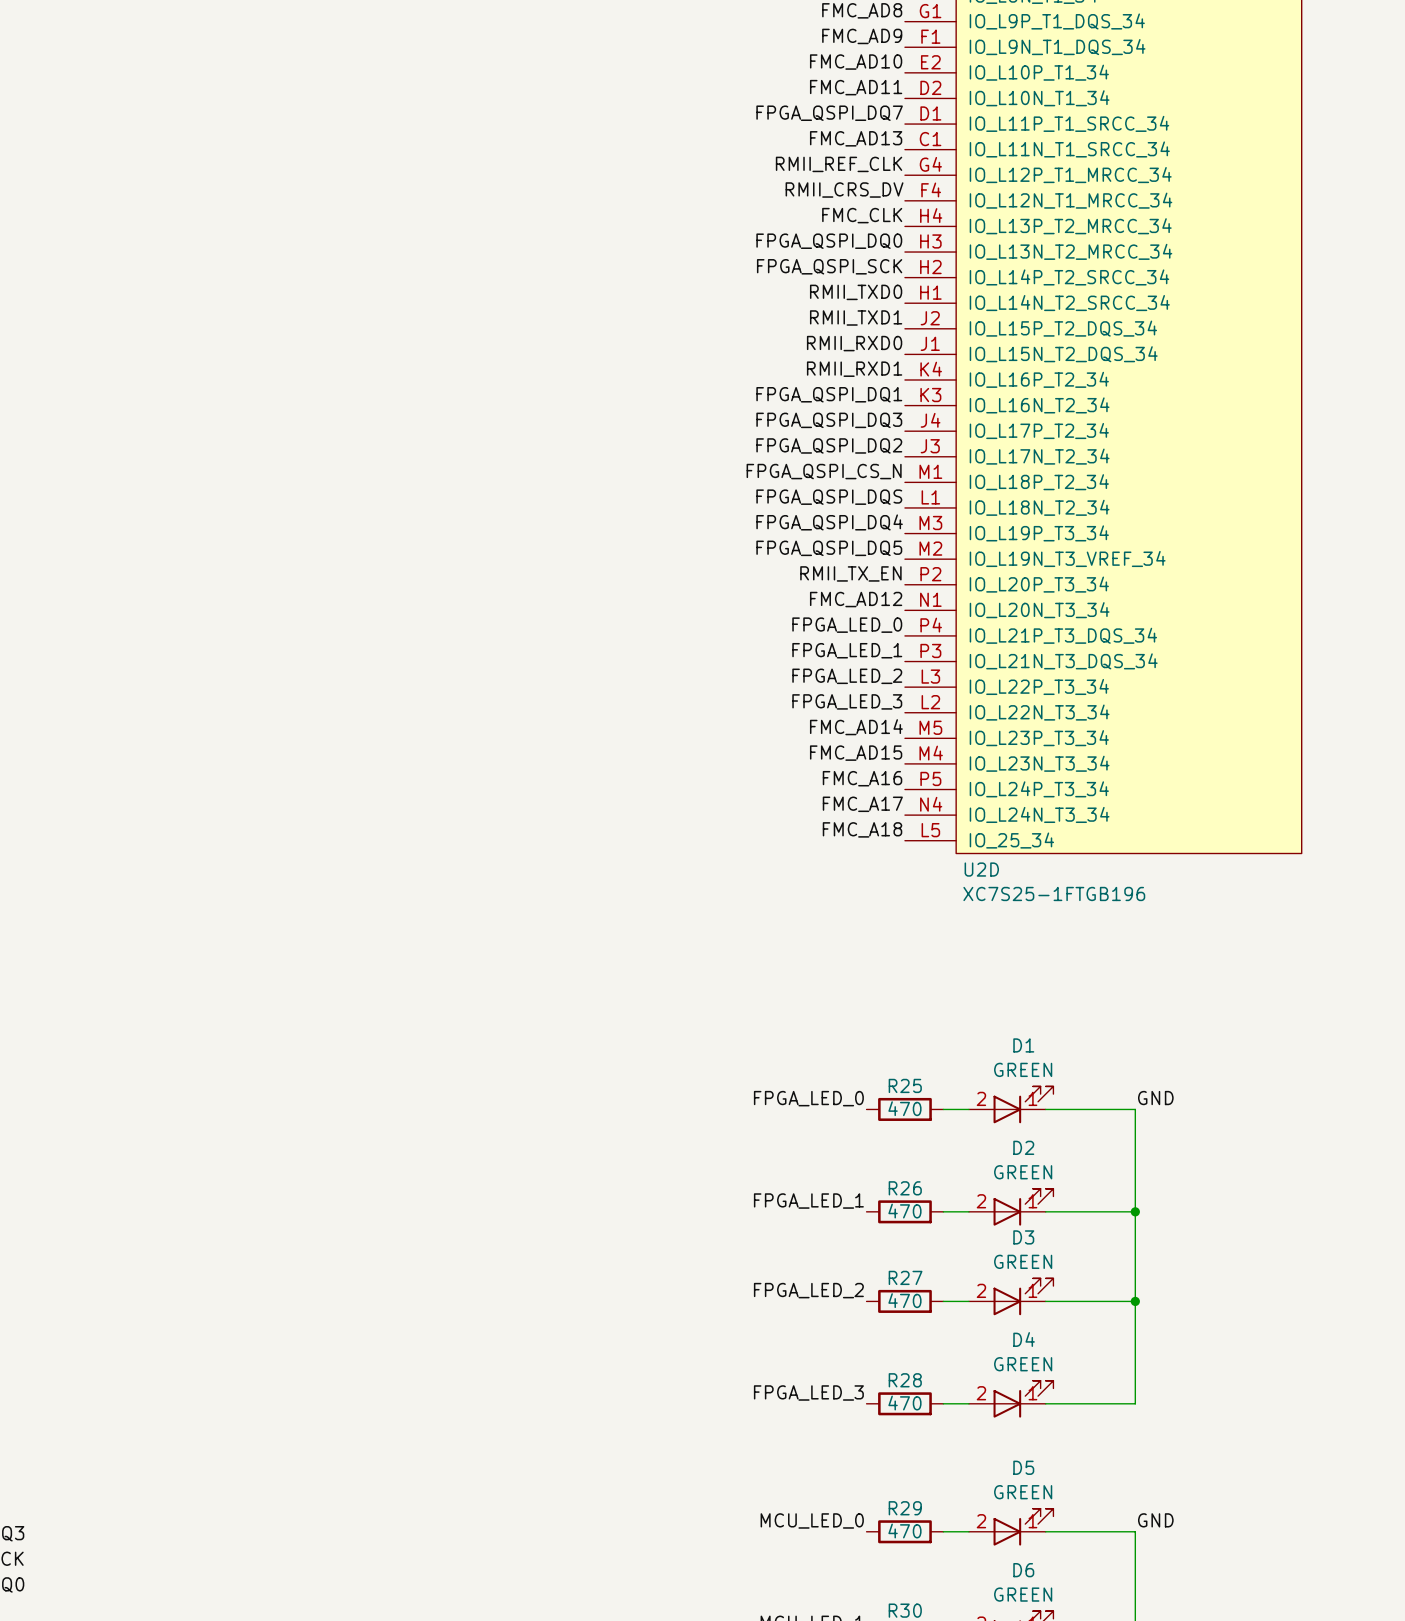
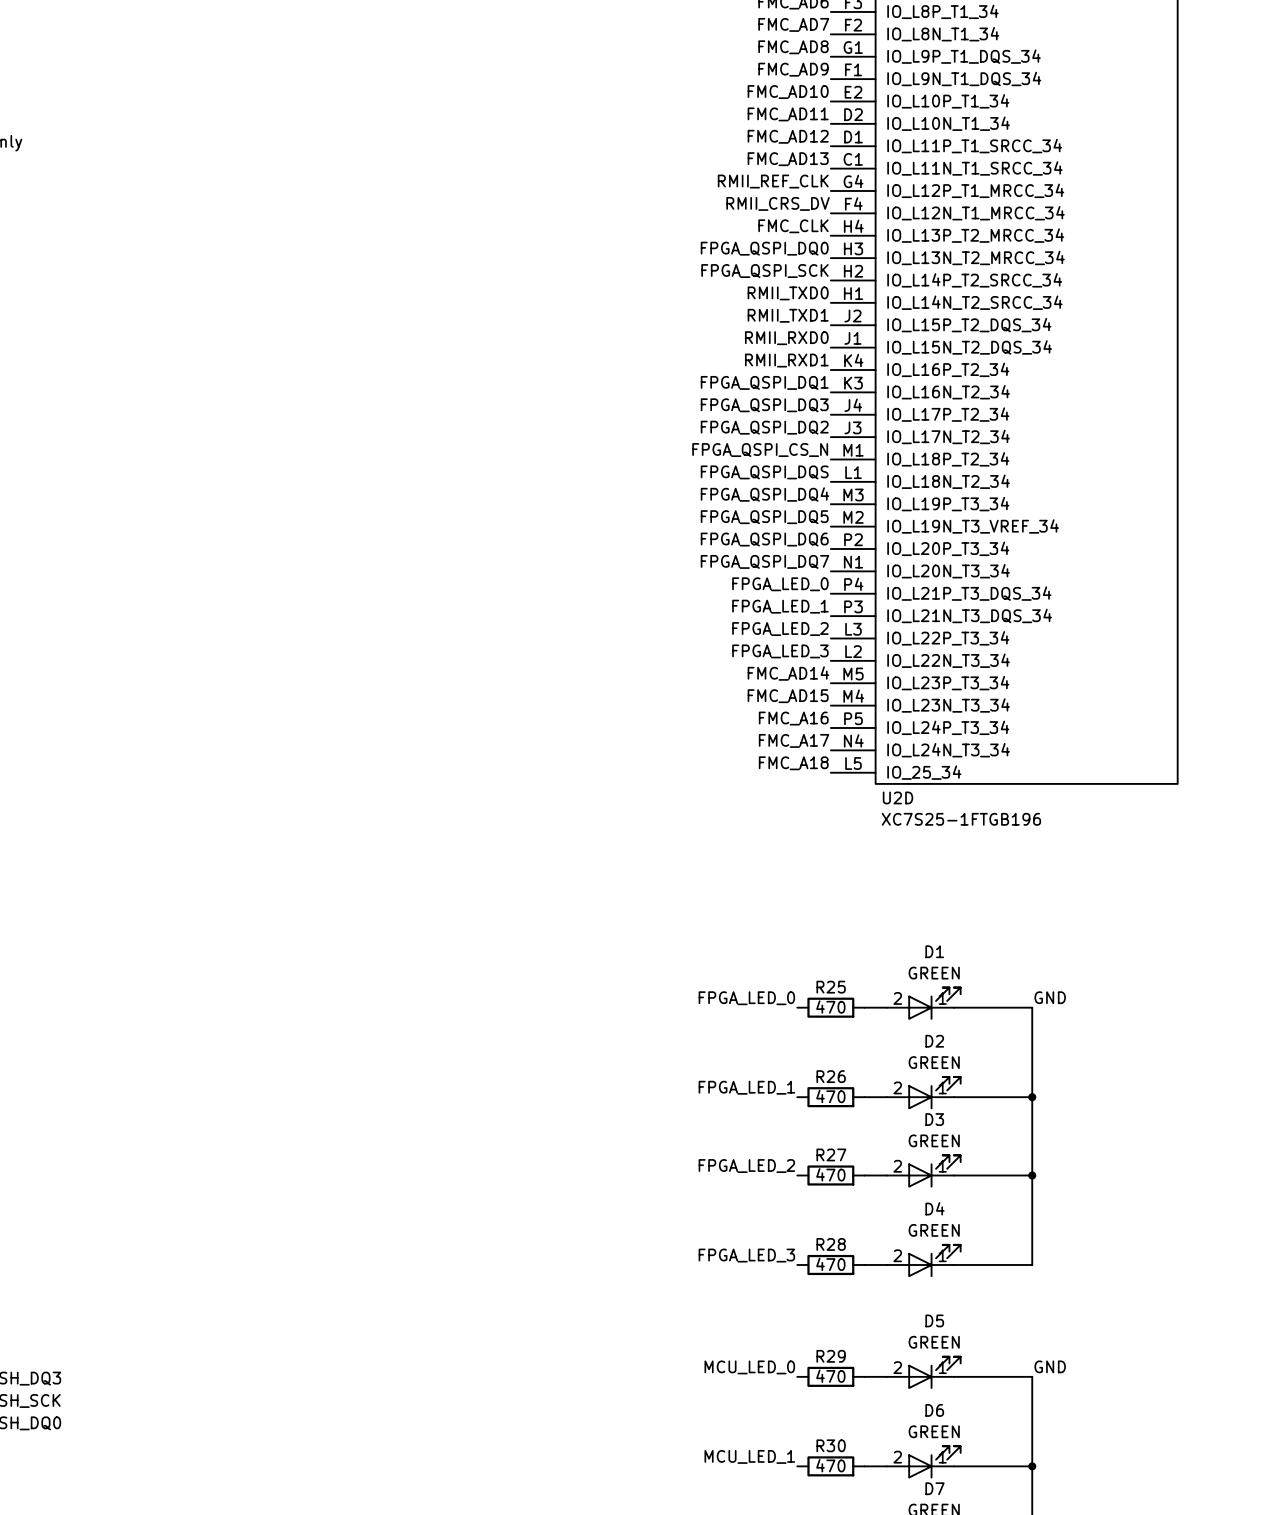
label: FPGA_QSPI_DQ7 (829, 113) -> FMC_AD12 (788, 136)
label: RMII_TX_EN (850, 573) -> FPGA_QSPI_DQ6 (764, 539)
label: FMC_AD12 (856, 599) -> FPGA_QSPI_DQ7 (764, 561)

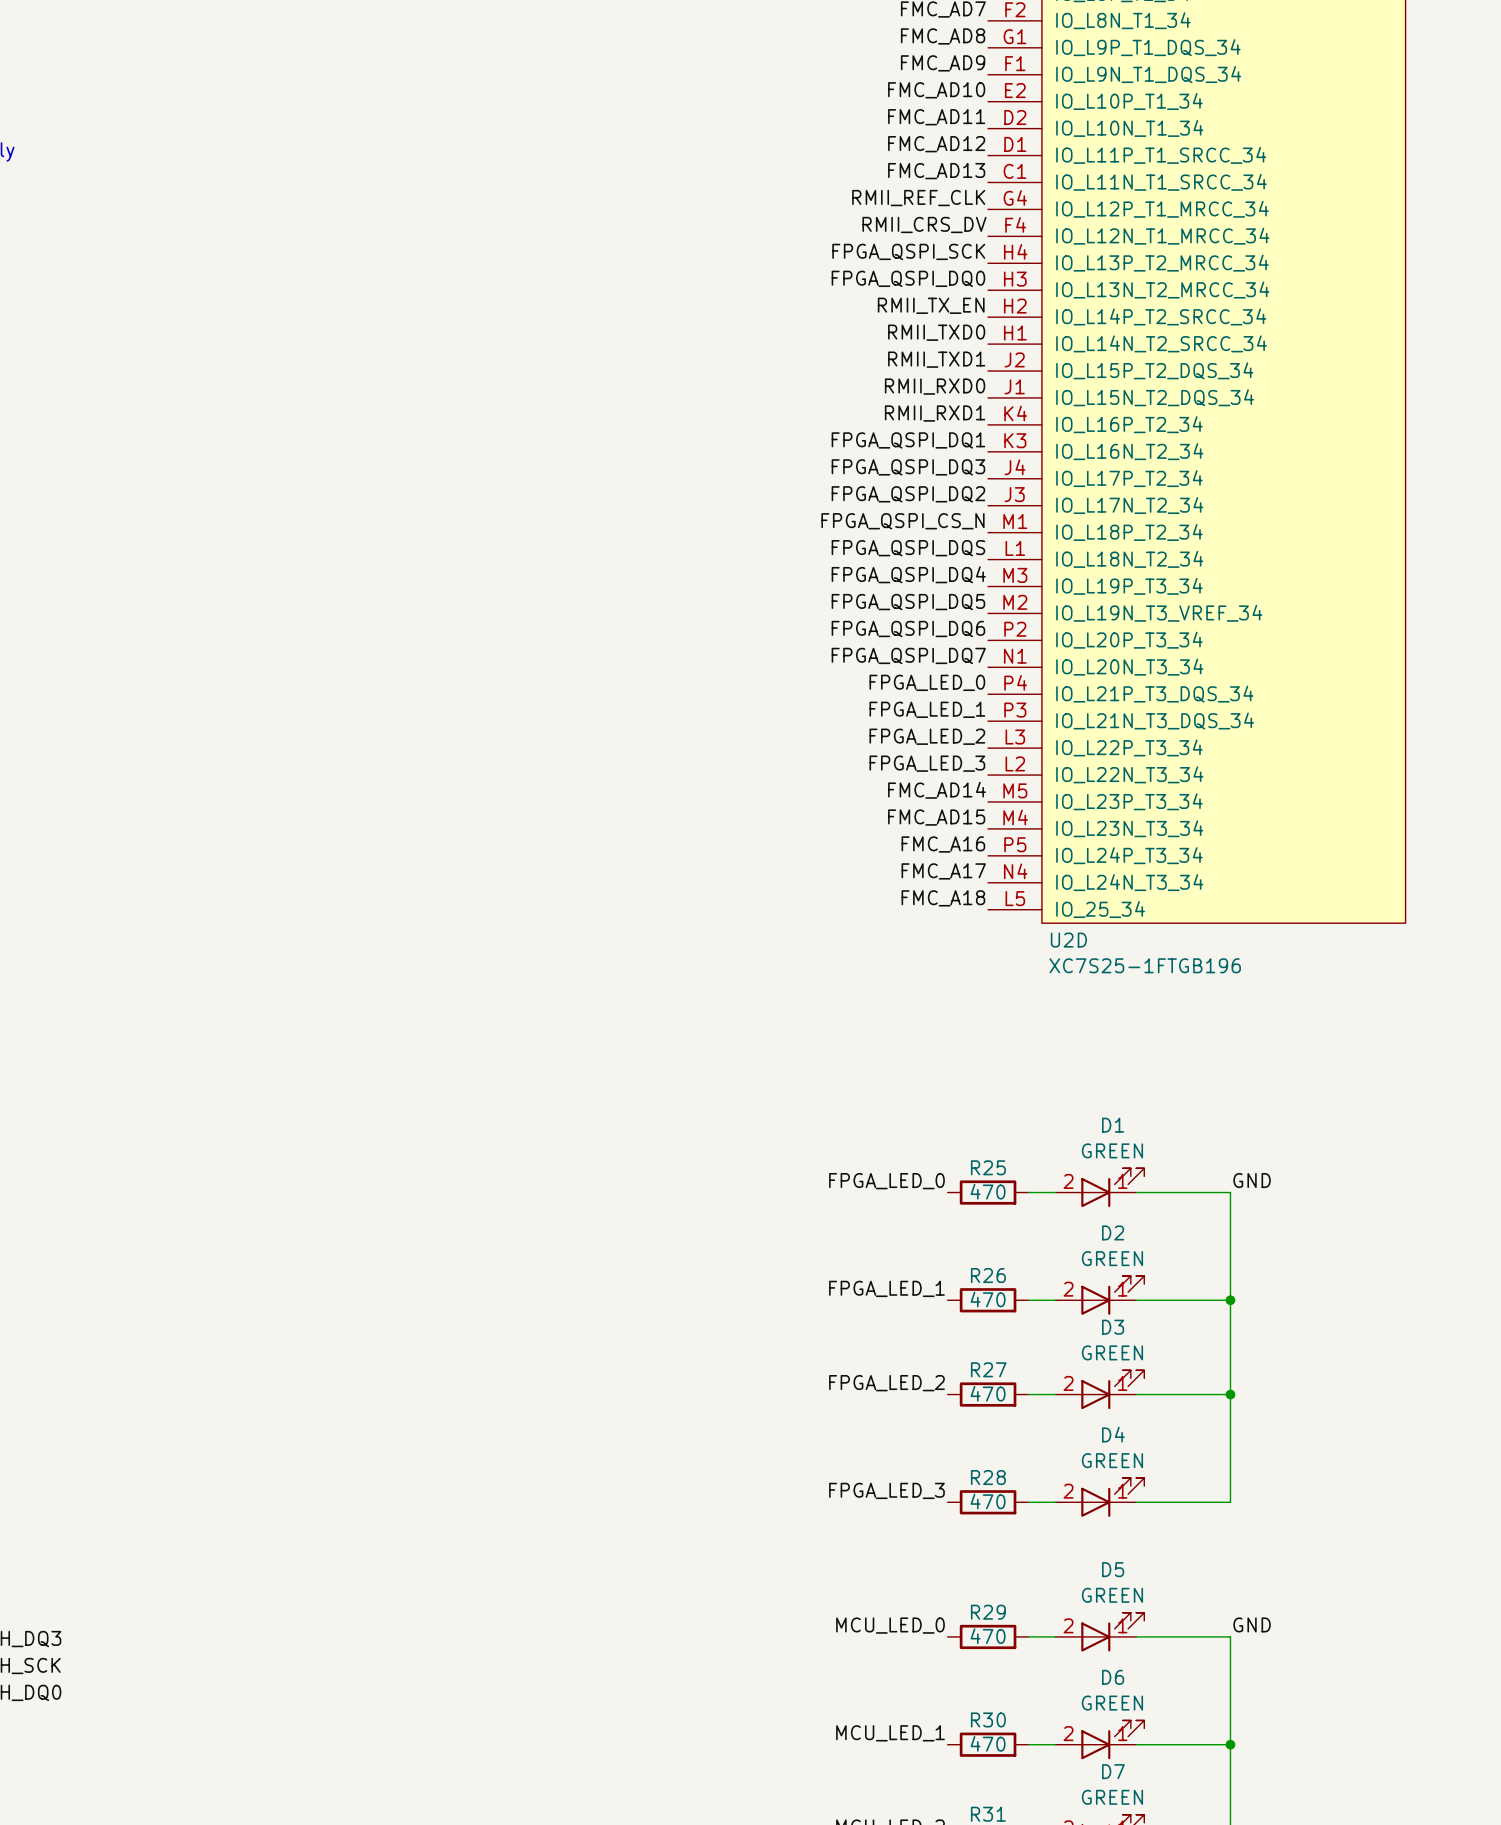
label: FMC_CLK (793, 226) -> FPGA_QSPI_SCK (908, 251)
label: FPGA_QSPI_SCK (764, 271) -> RMII_TX_EN (931, 305)

